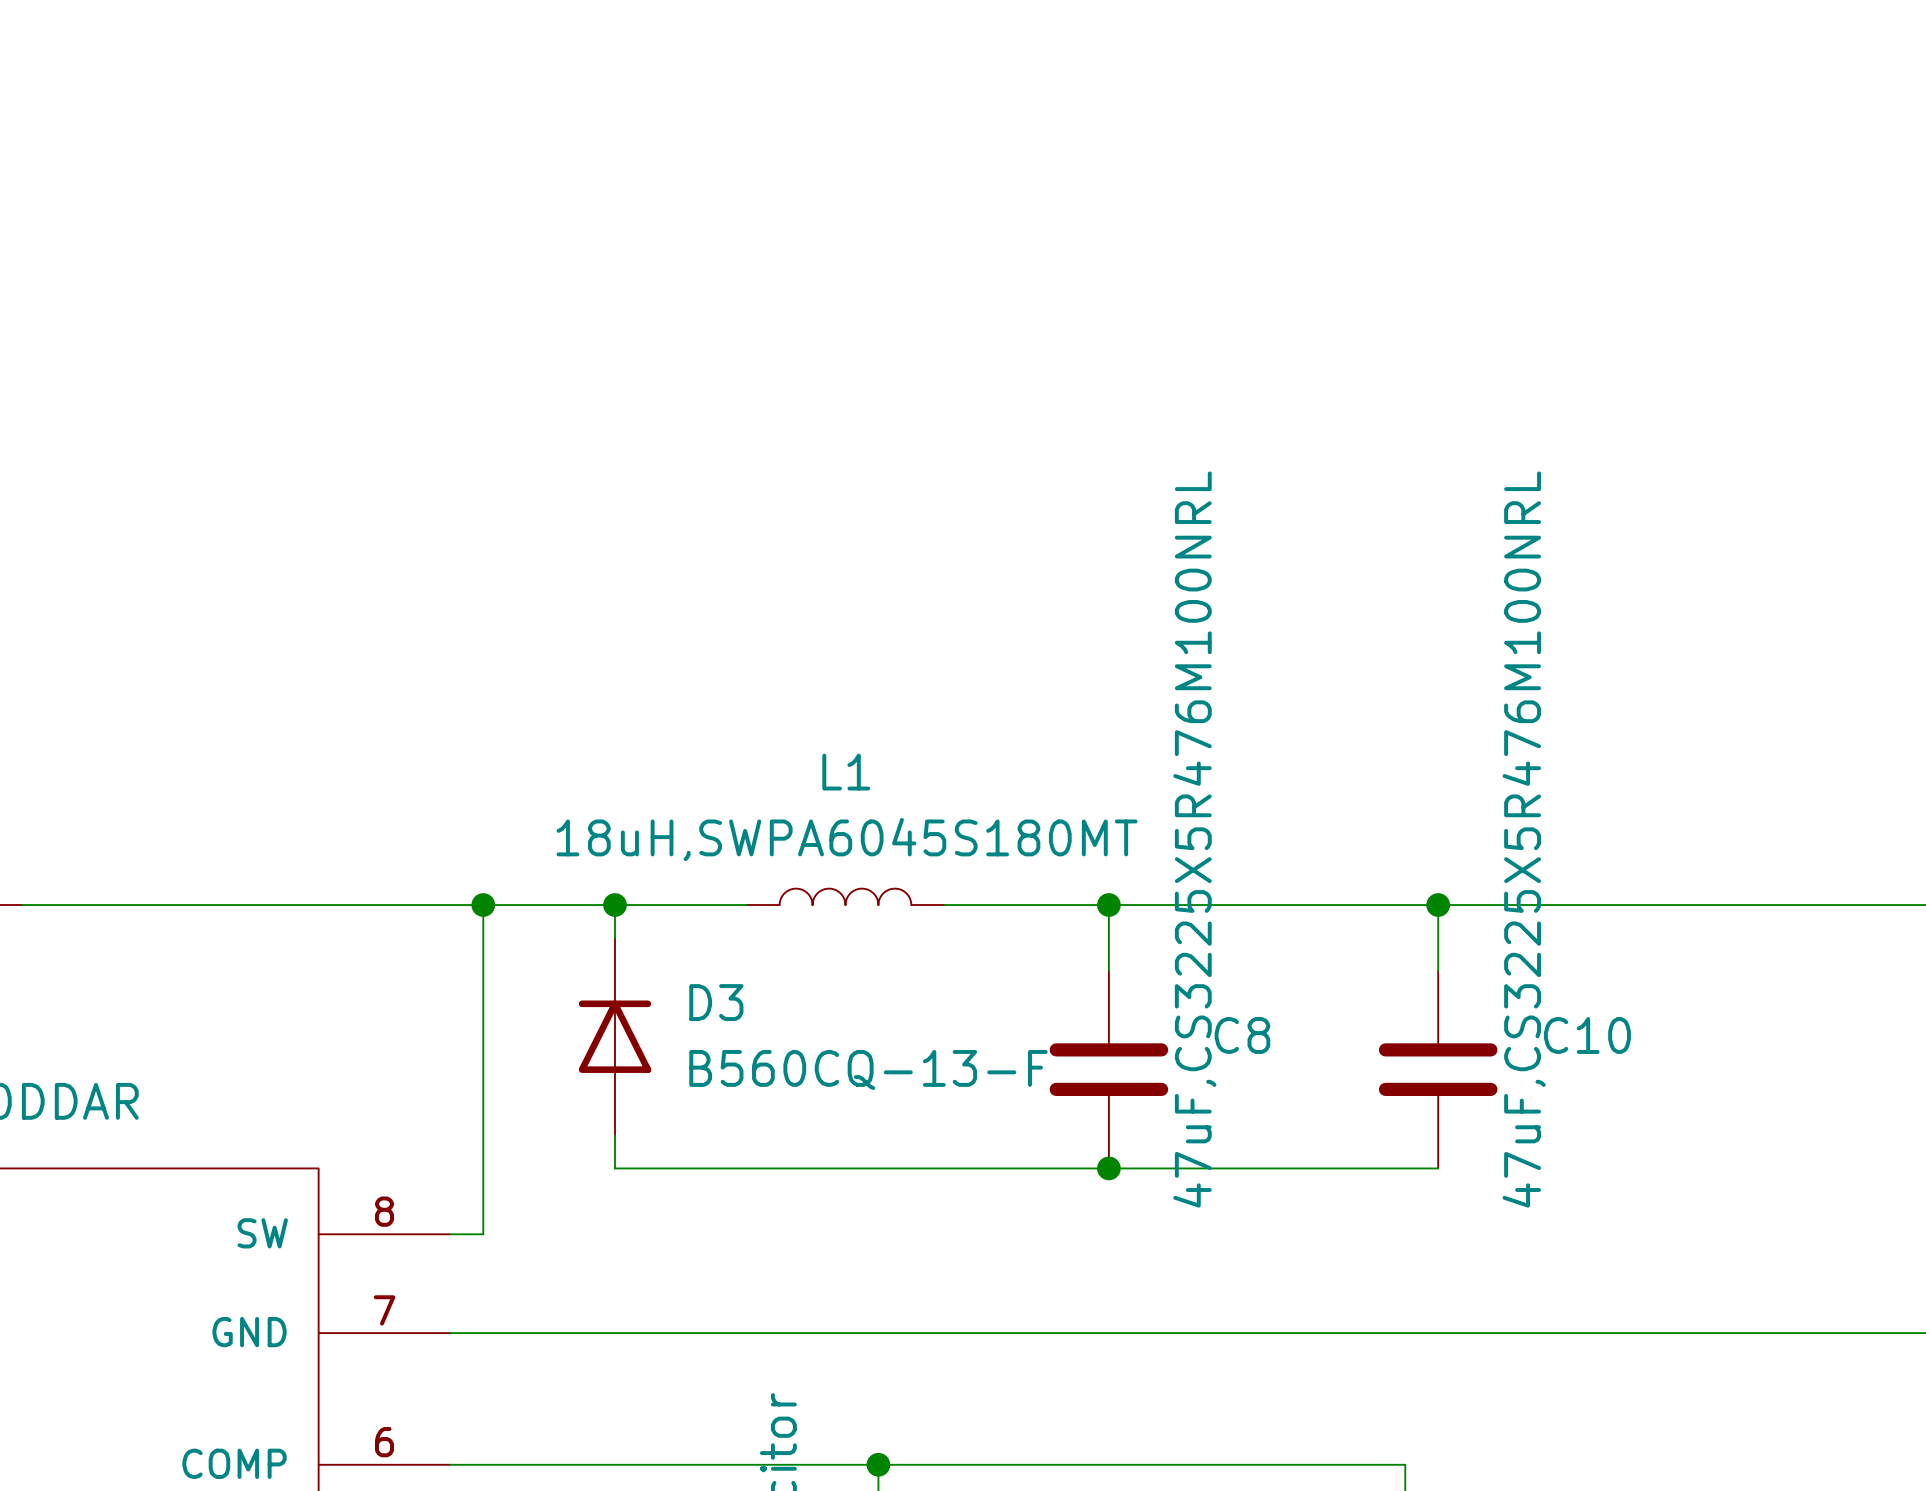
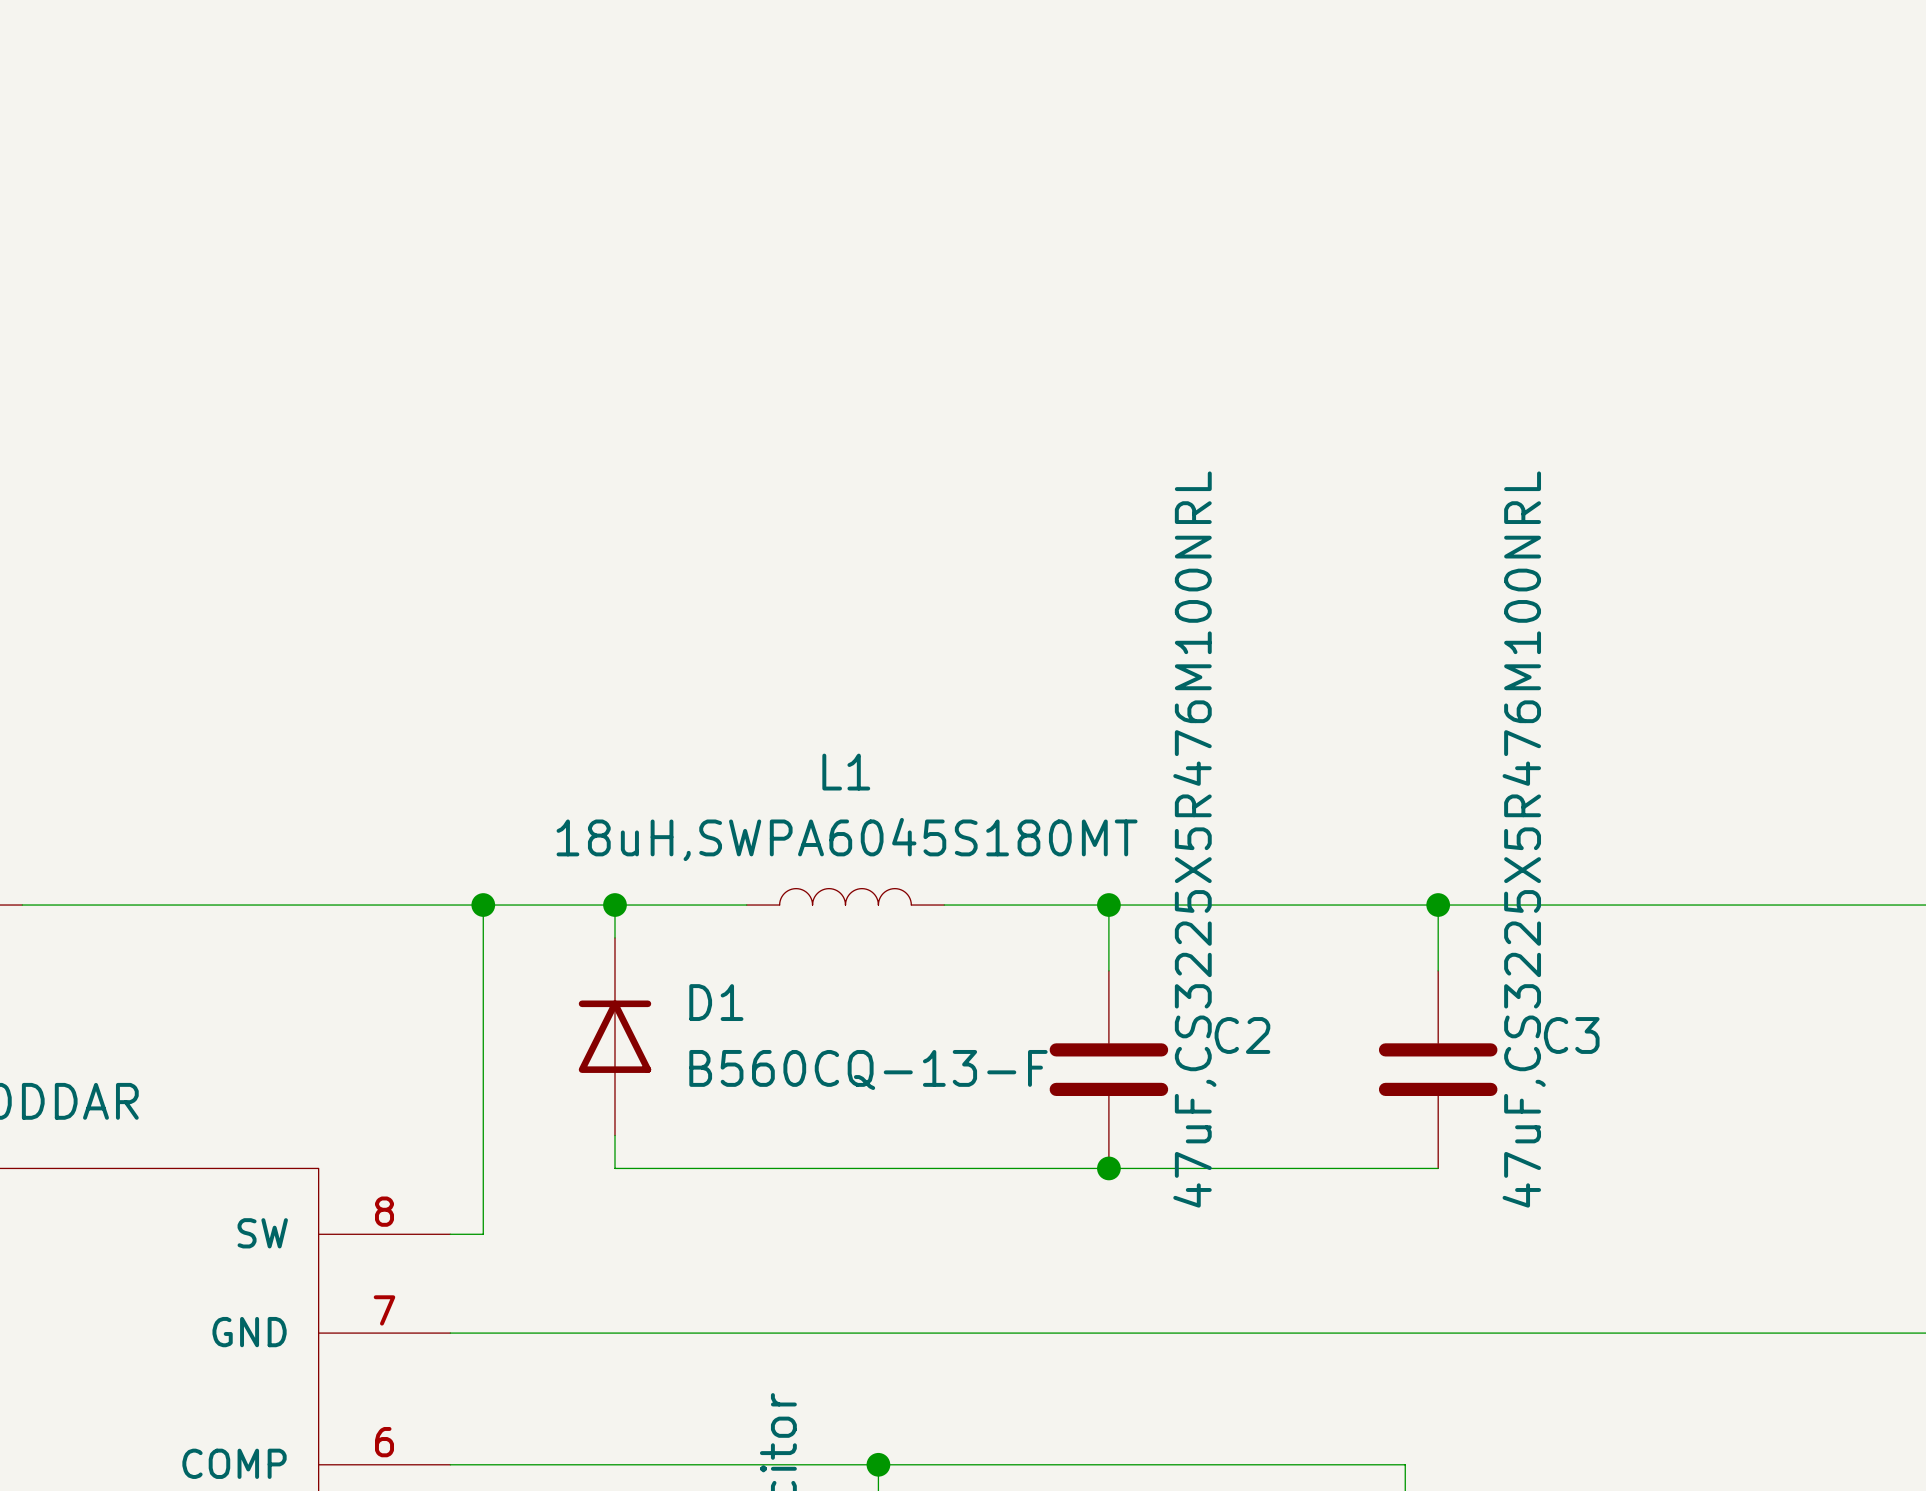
D3 name: D3 (716, 1002) -> D1 (716, 1002)
C8 name: C8 (1242, 1035) -> C2 (1242, 1035)
C10 name: C10 (1587, 1035) -> C3 (1571, 1035)

